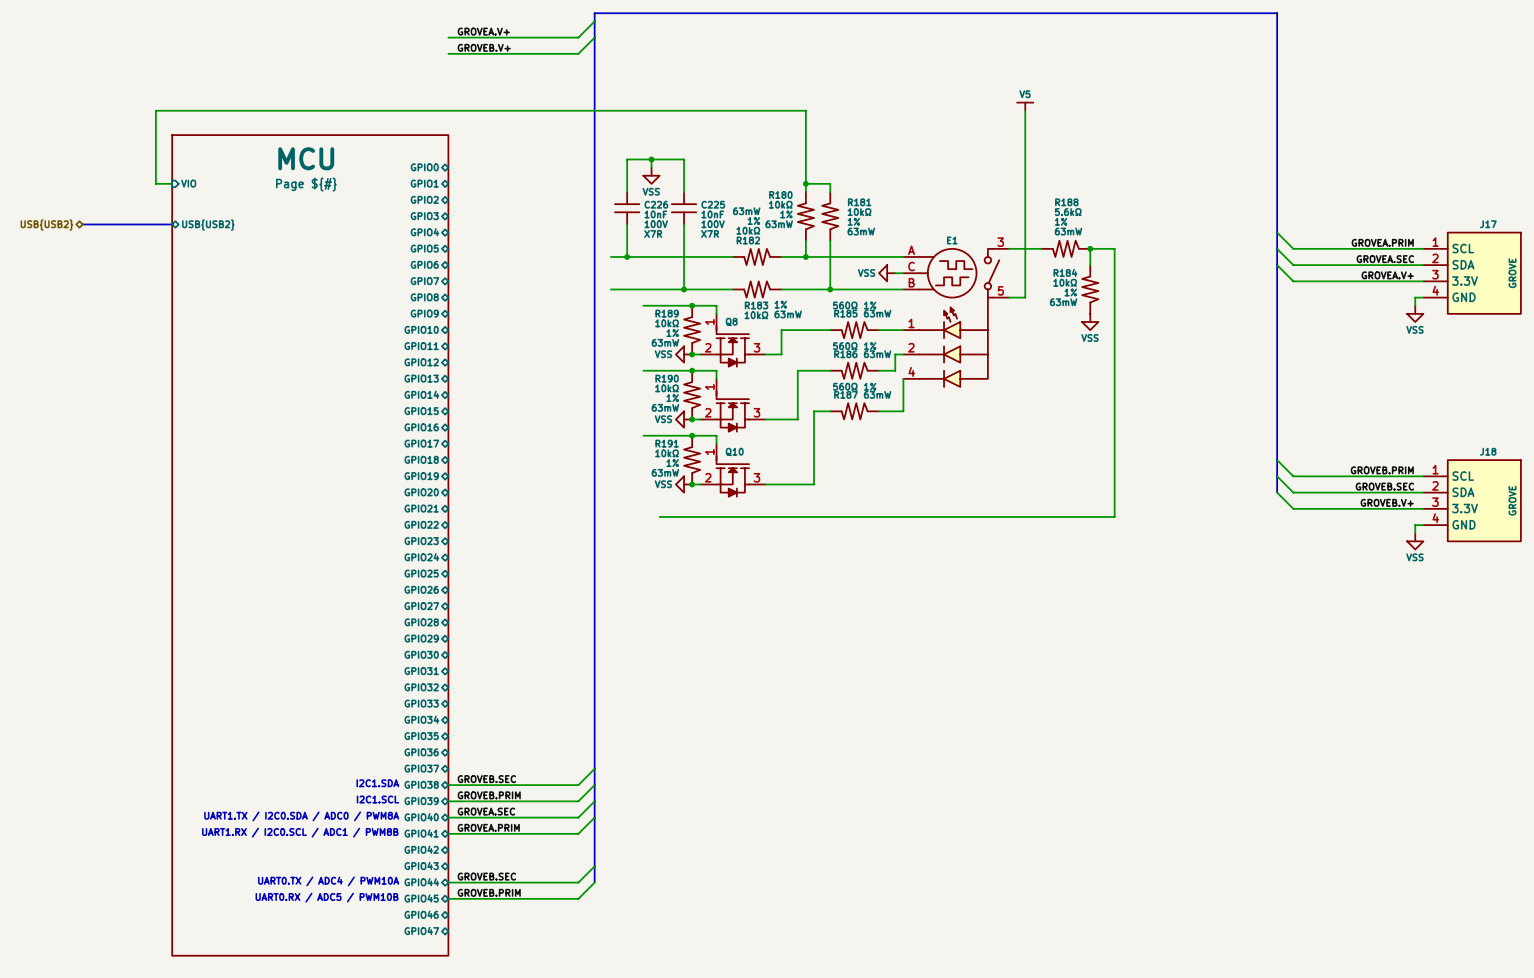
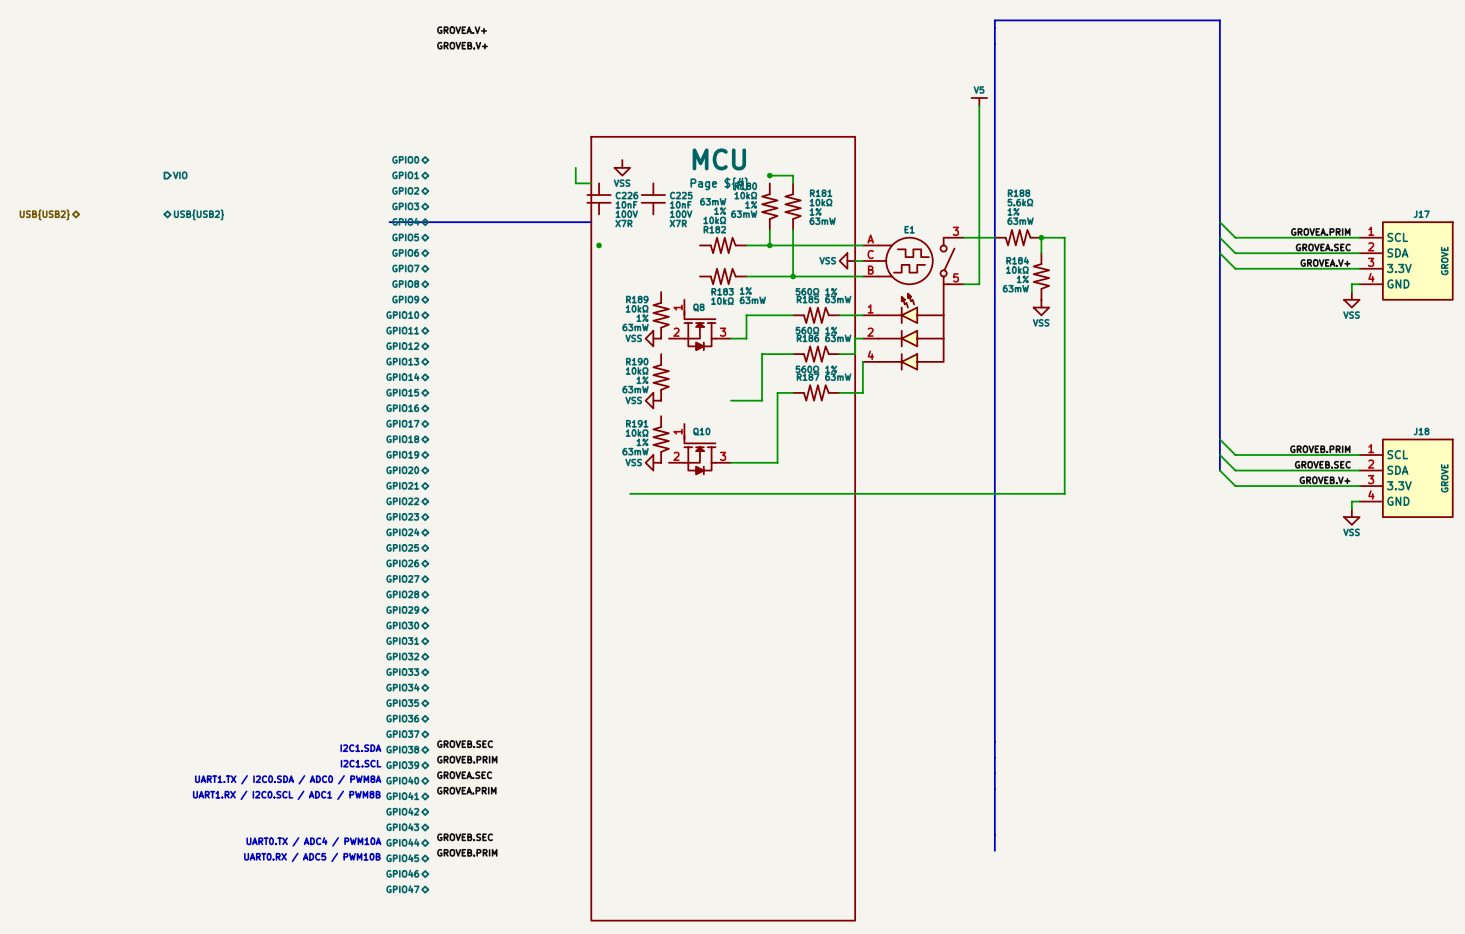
wire: (594, 21) (578, 37) (448, 37) -> none
bus: (1277, 21) (1277, 13) (594, 13) (594, 882) -> (1219, 20) (994, 20) (994, 850)
wire: (594, 37) (578, 53) (448, 53) -> none
wire: (651, 159) (651, 167) -> none
junction: (651, 159) -> none
wire: none -> (575, 167) (575, 183) (591, 183)
wire: (172, 183) (155, 183) (155, 110) (805, 110) (805, 191) -> none
wire: (627, 191) (627, 159) (684, 159) (684, 191) -> none
bus: (82, 224) (172, 224) -> none
wire: (627, 224) (627, 256) -> none
wire: (684, 224) (684, 289) -> none
bus: none -> (389, 222) (591, 222)
wire: (610, 256) (732, 256) -> none
wire: (610, 289) (732, 289) -> none
junction: (684, 289) -> none
wire: (643, 305) (716, 305) (716, 313) -> none
junction: (692, 305) -> none
wire: (692, 354) (700, 354) -> none
junction: (692, 354) -> none
wire: (643, 370) (716, 370) (716, 378) -> none
junction: (692, 370) -> none
part: (732, 405) -> none
wire: (692, 419) (700, 419) -> none
junction: (692, 419) -> none
wire: (643, 435) (716, 435) (716, 443) -> none
junction: (692, 435) -> none
wire: (692, 484) (700, 484) -> none
junction: (692, 484) -> none
sheet MCU: (310, 545) -> none
sheet MCU: none -> (723, 528)
wire: (594, 768) (578, 785) (448, 785) -> none
wire: (594, 785) (578, 801) (448, 801) -> none
wire: (594, 801) (578, 817) (448, 817) -> none
wire: (594, 817) (578, 833) (448, 833) -> none
wire: (594, 866) (578, 882) (448, 882) -> none
wire: (594, 882) (578, 898) (448, 898) -> none

